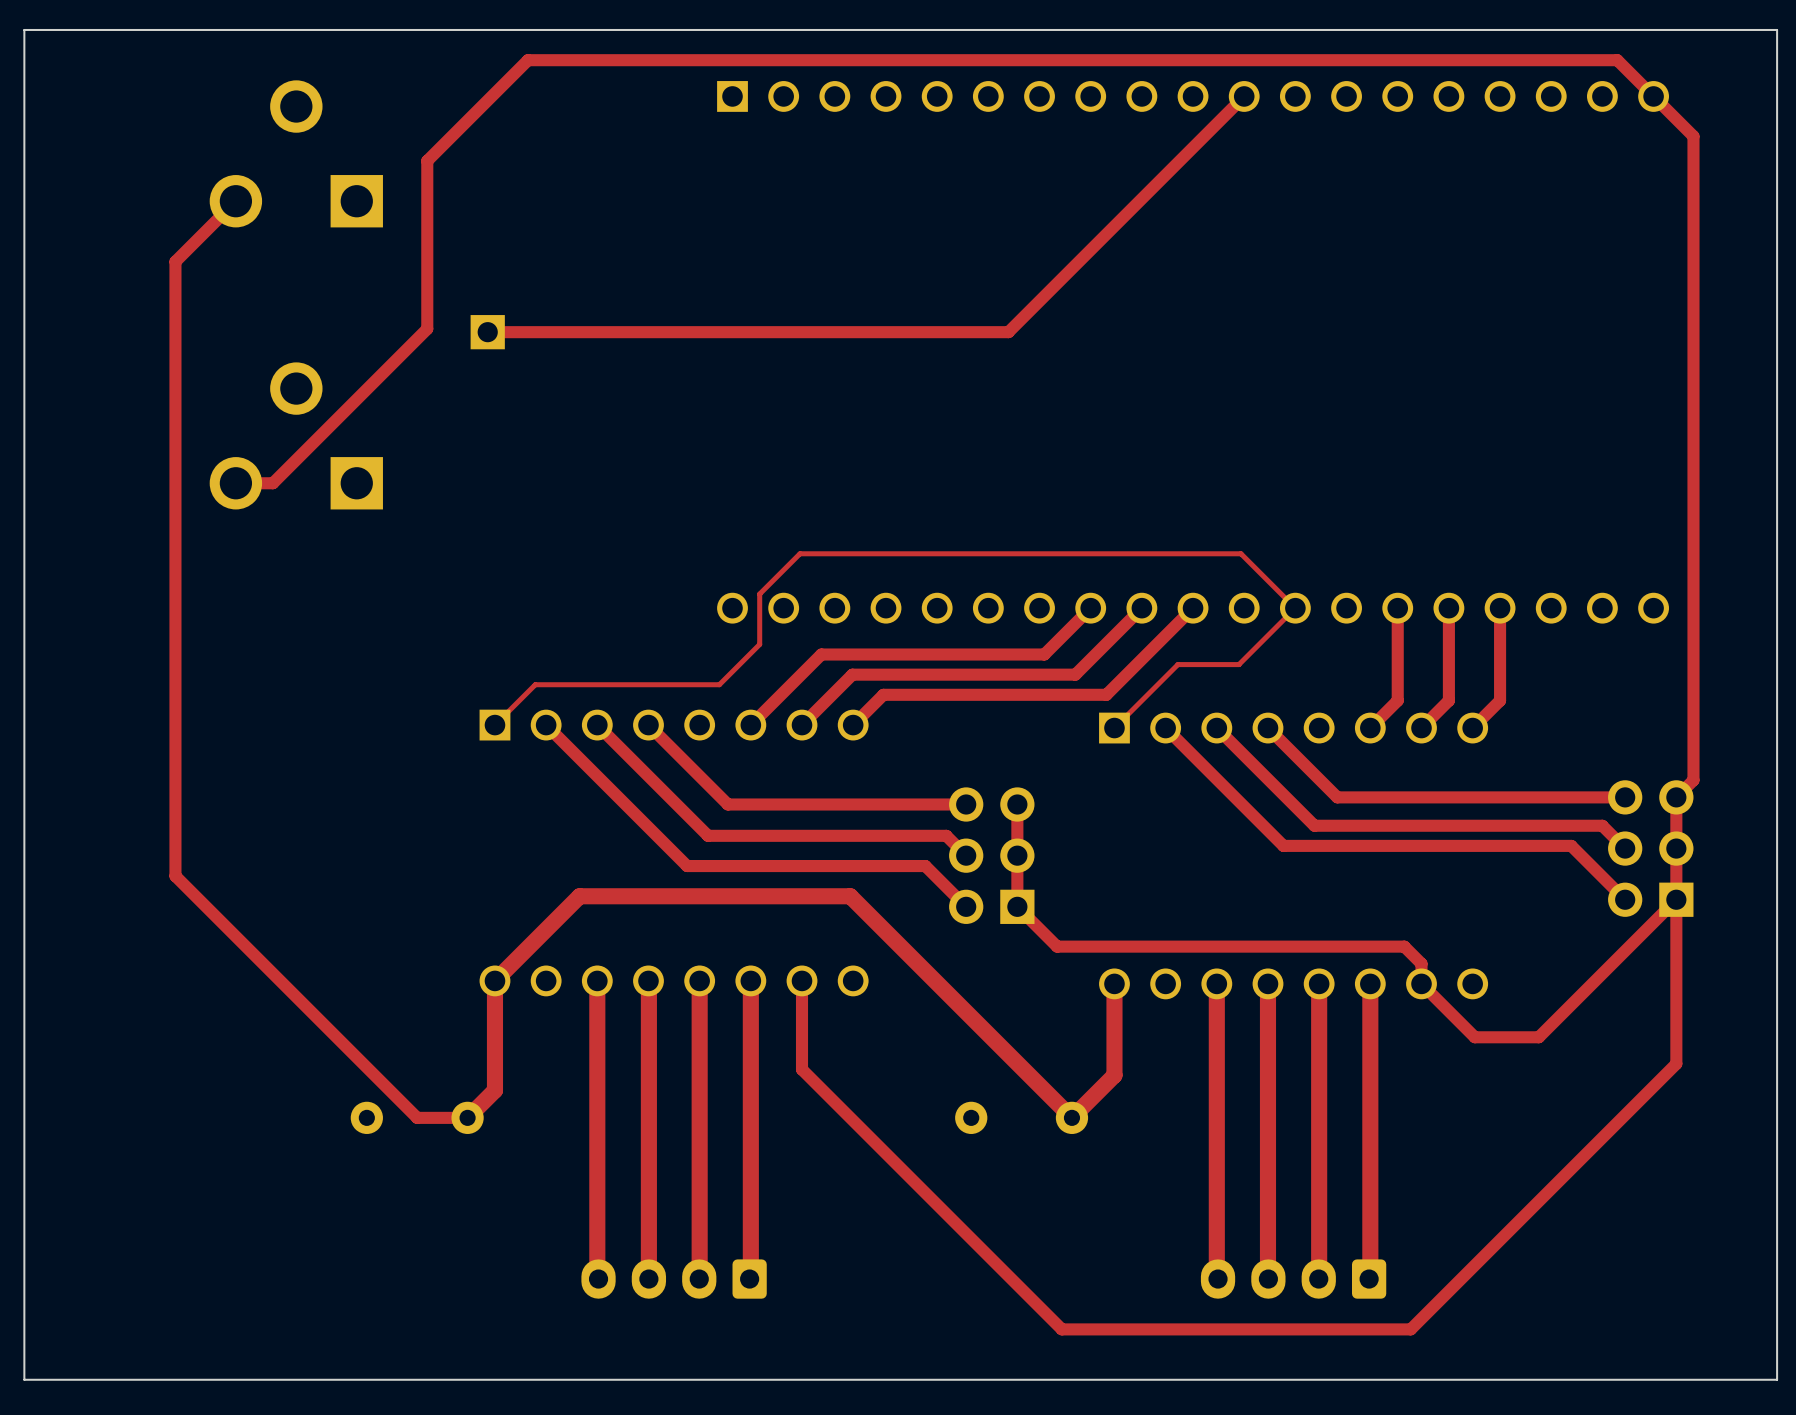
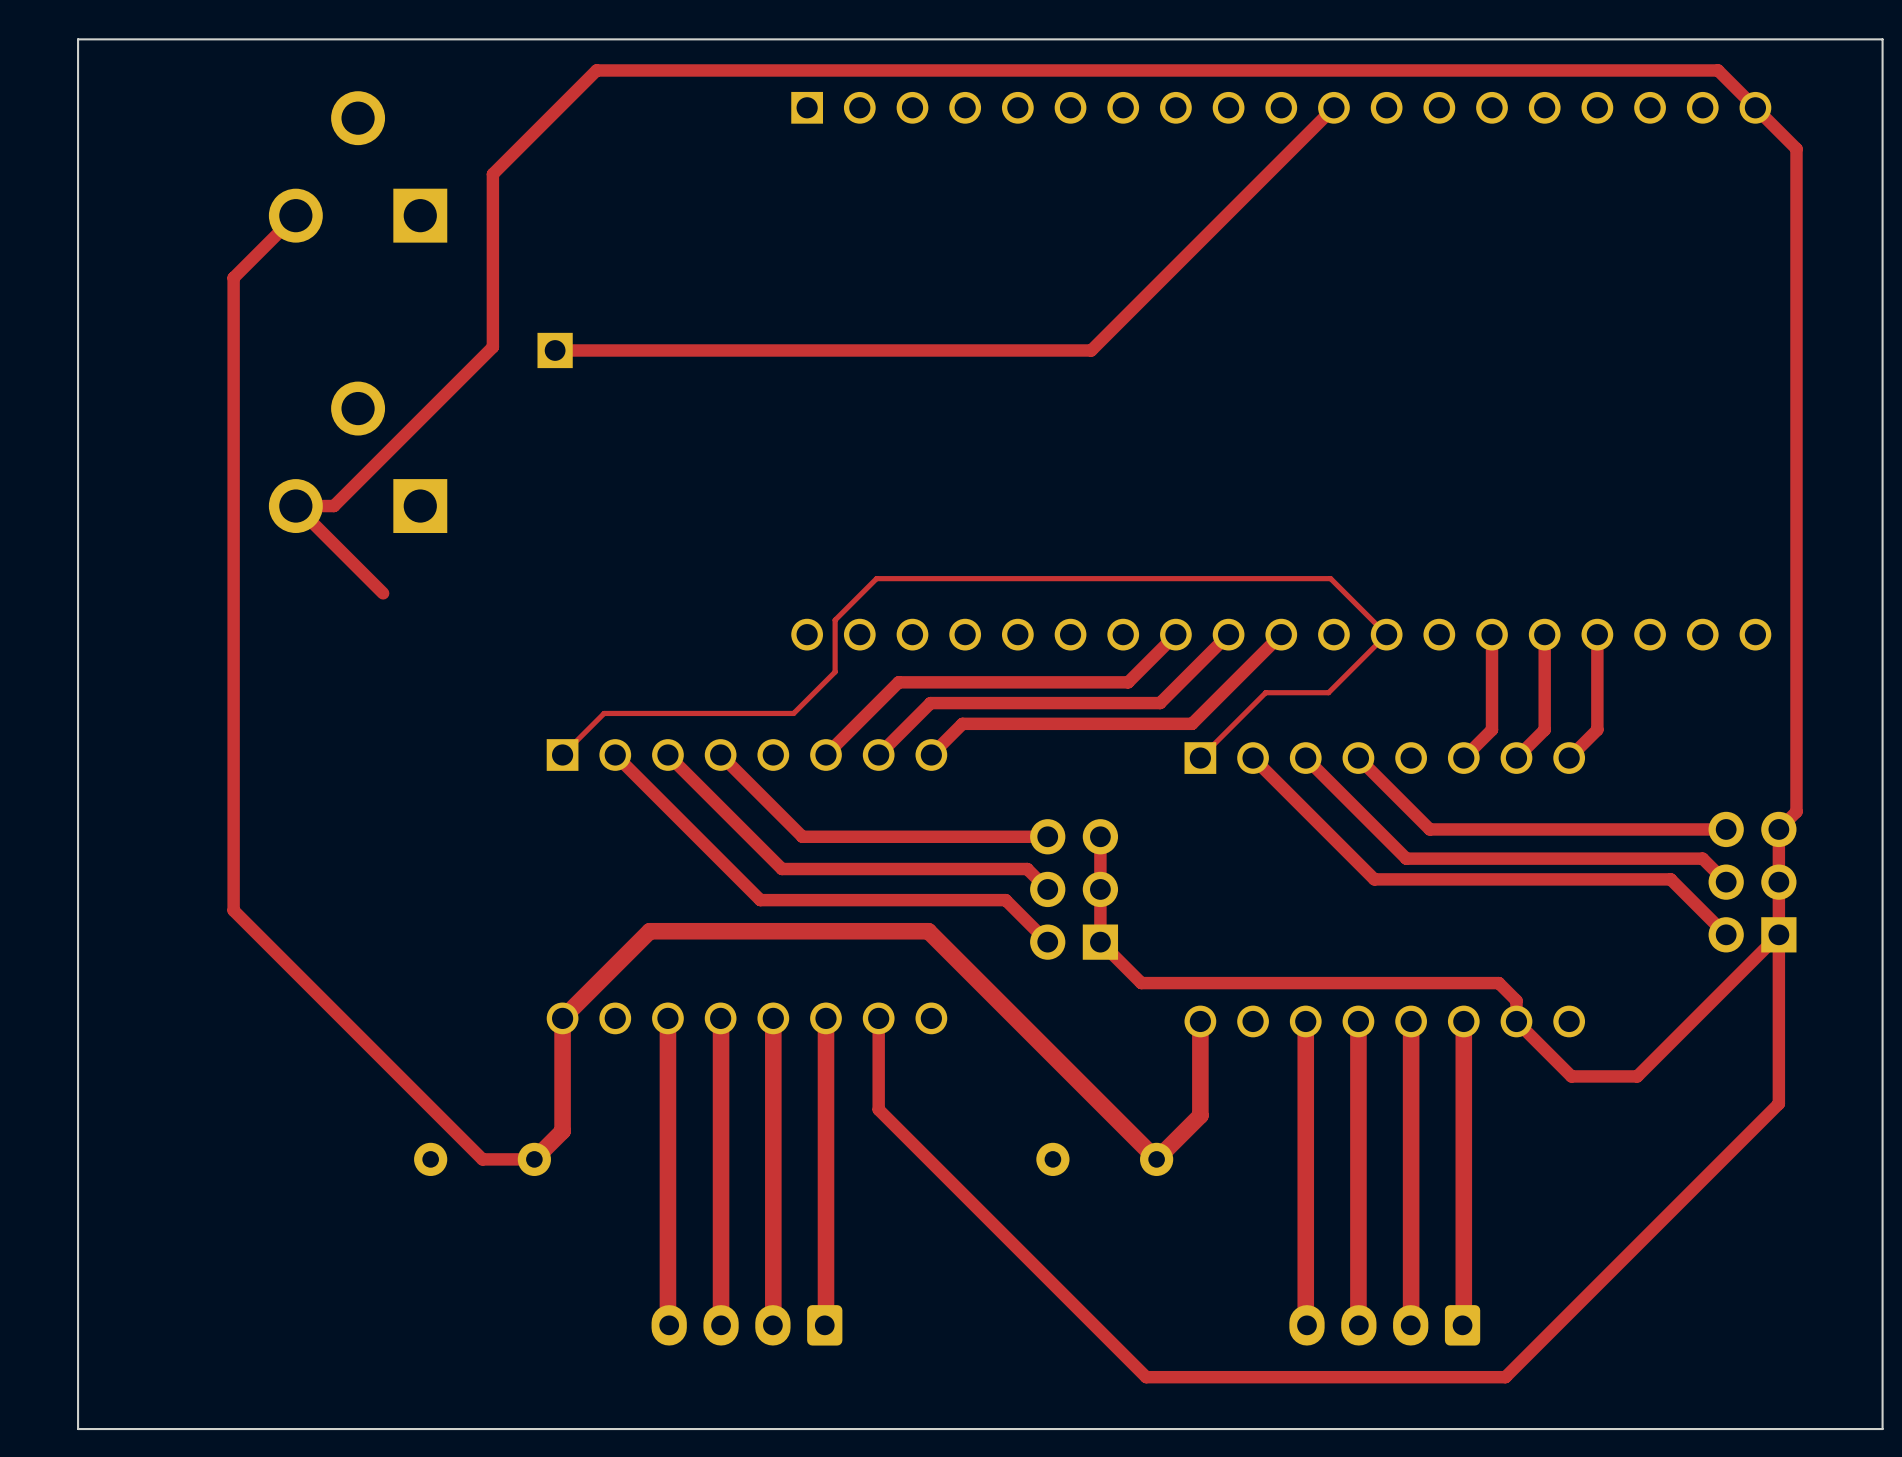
top track: none -> (295, 506) (383, 593)

